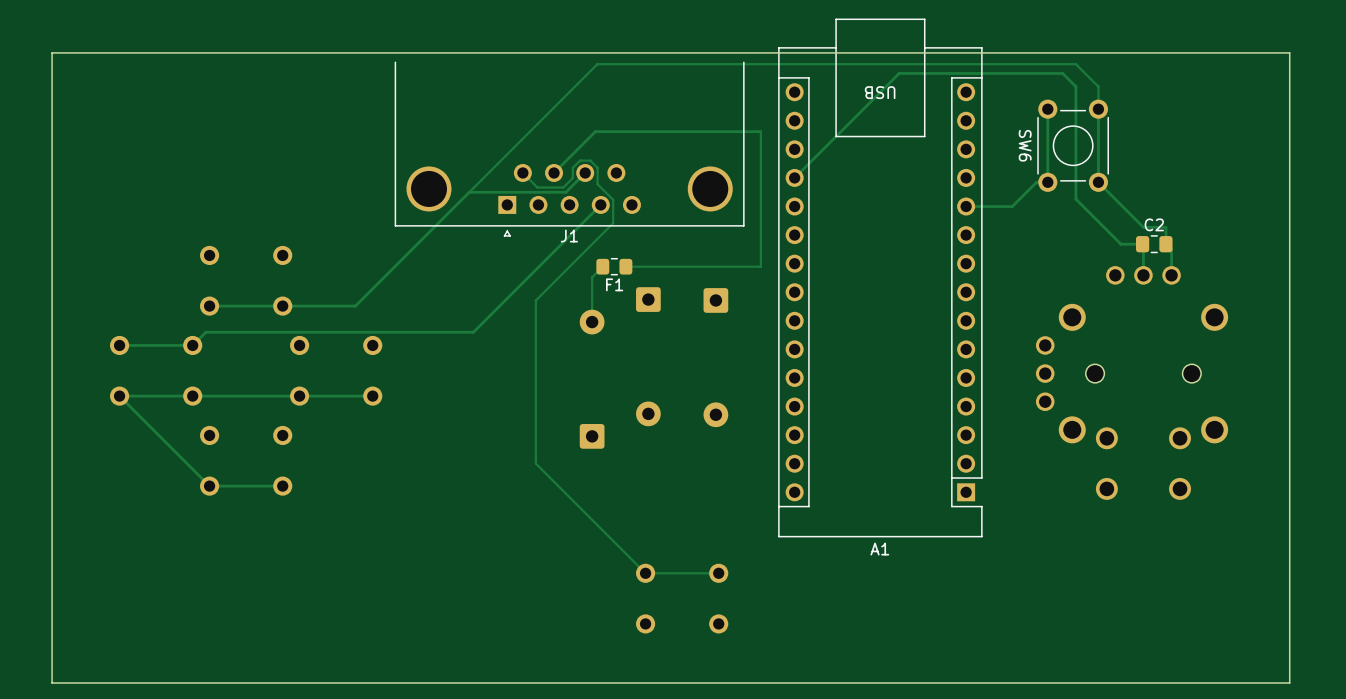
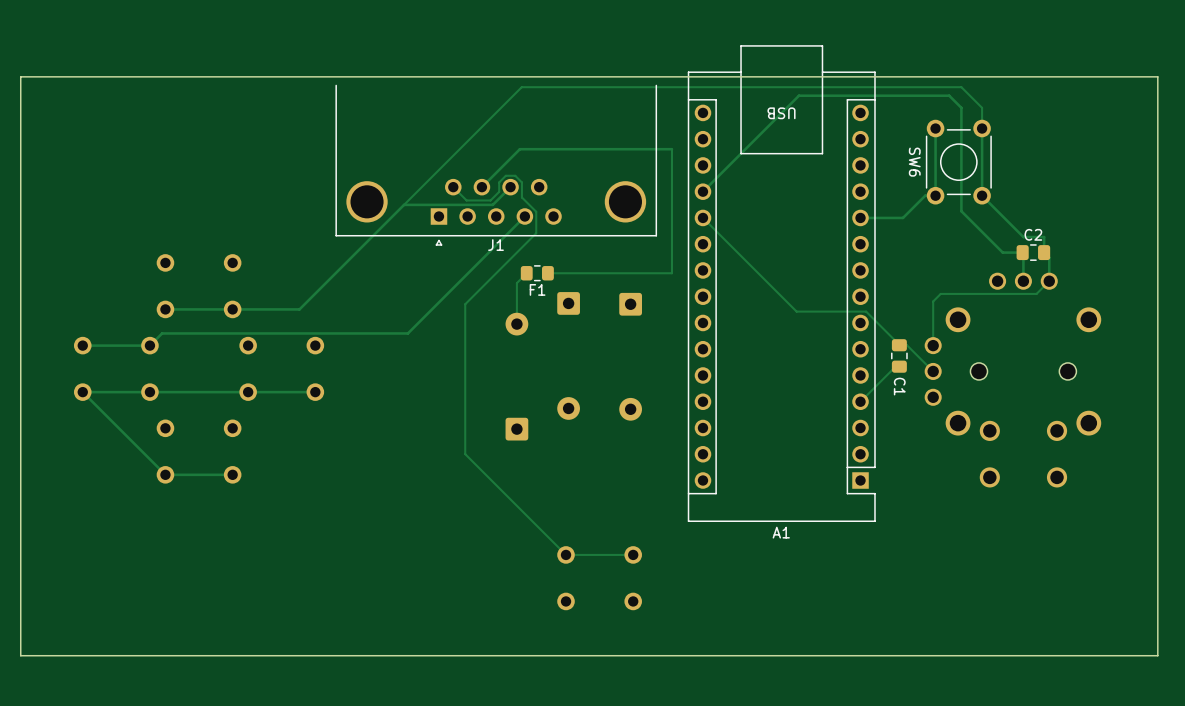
track: none -> (702, 217) (796, 311) (866, 311) (899, 344) (906, 344) (933, 371)
track: none -> (1049, 281) (1036, 293) (940, 293) (933, 301) (933, 345)
C1: none -> (899, 355)
track: none -> (899, 366) (895, 366) (860, 401)

